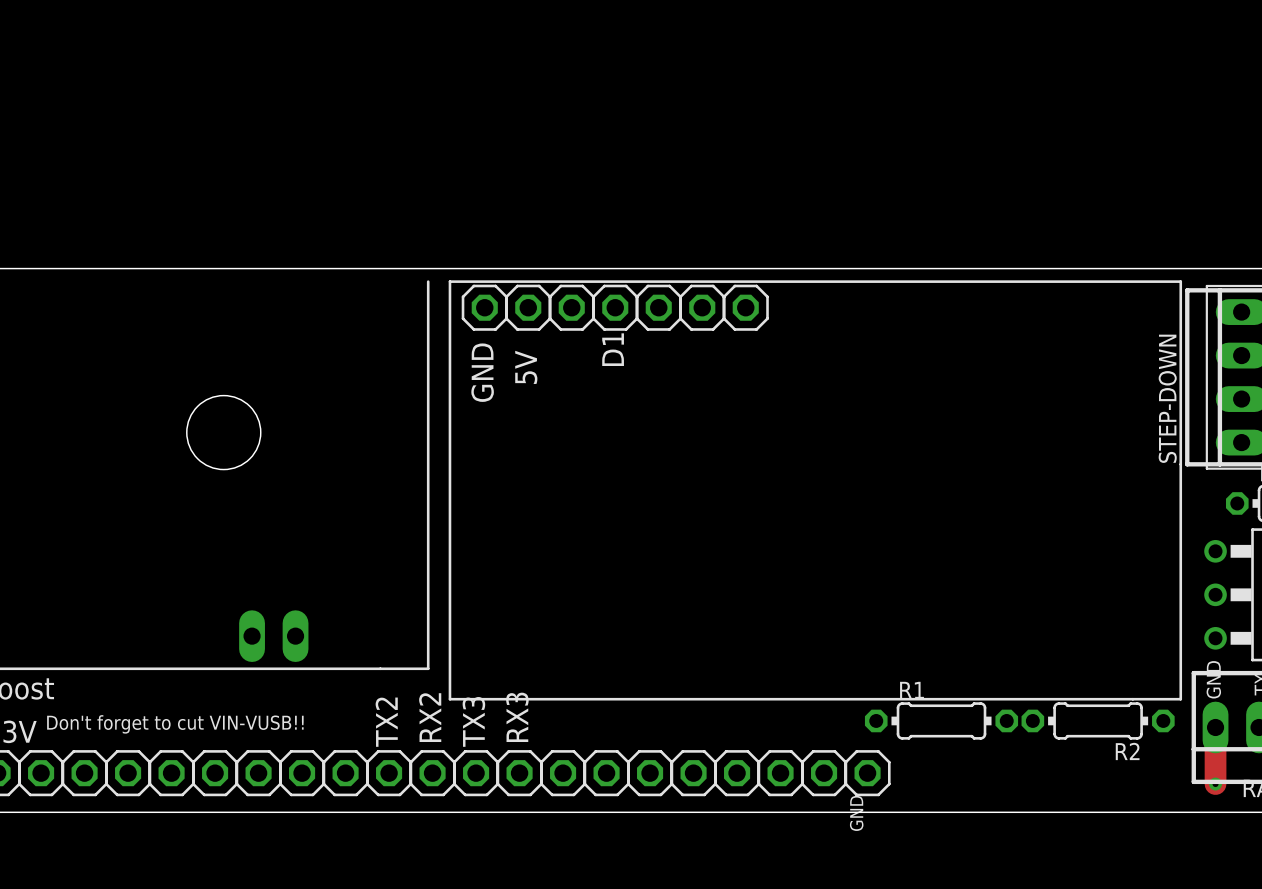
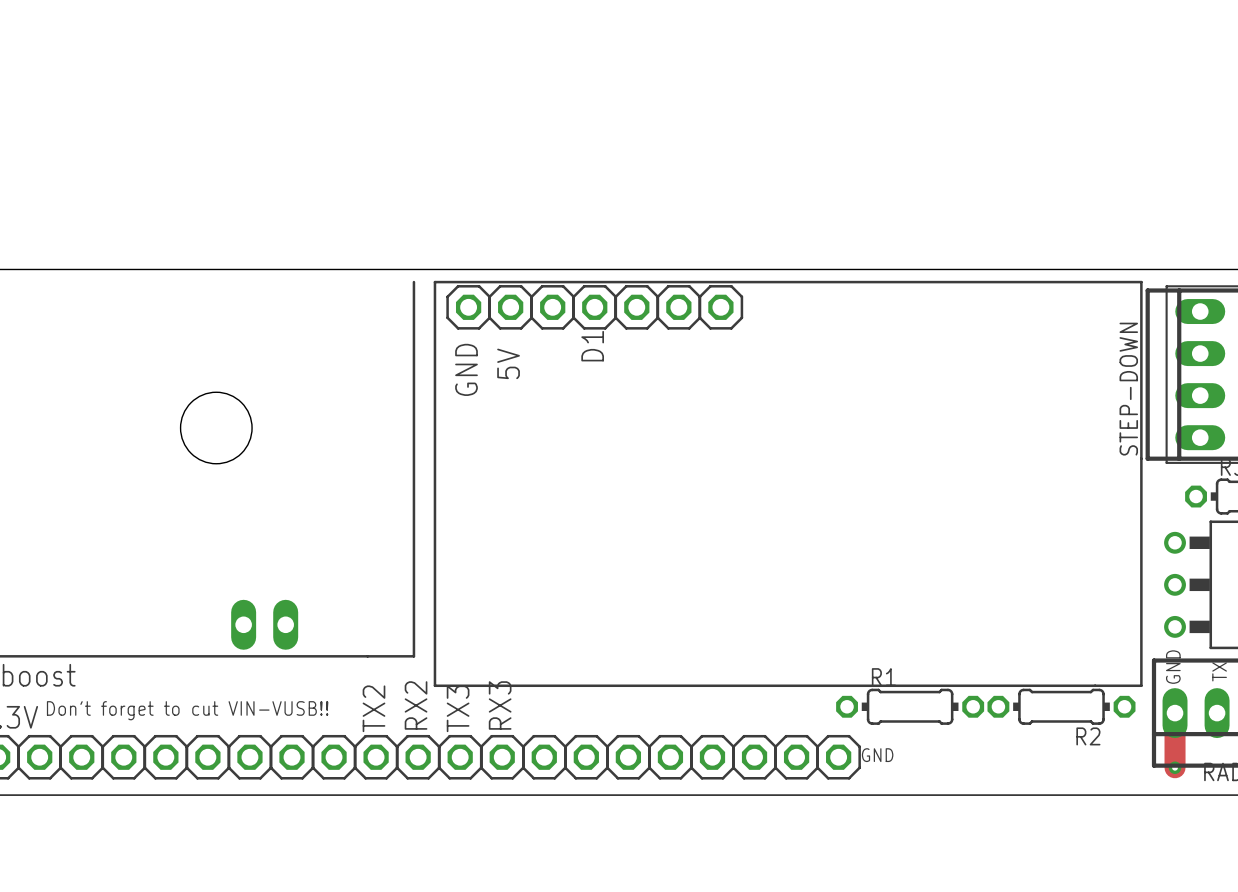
text rotation: 0° (856, 813) -> 90° clockwise (877, 755)
text position: GND (856, 813) -> GND (877, 755)

